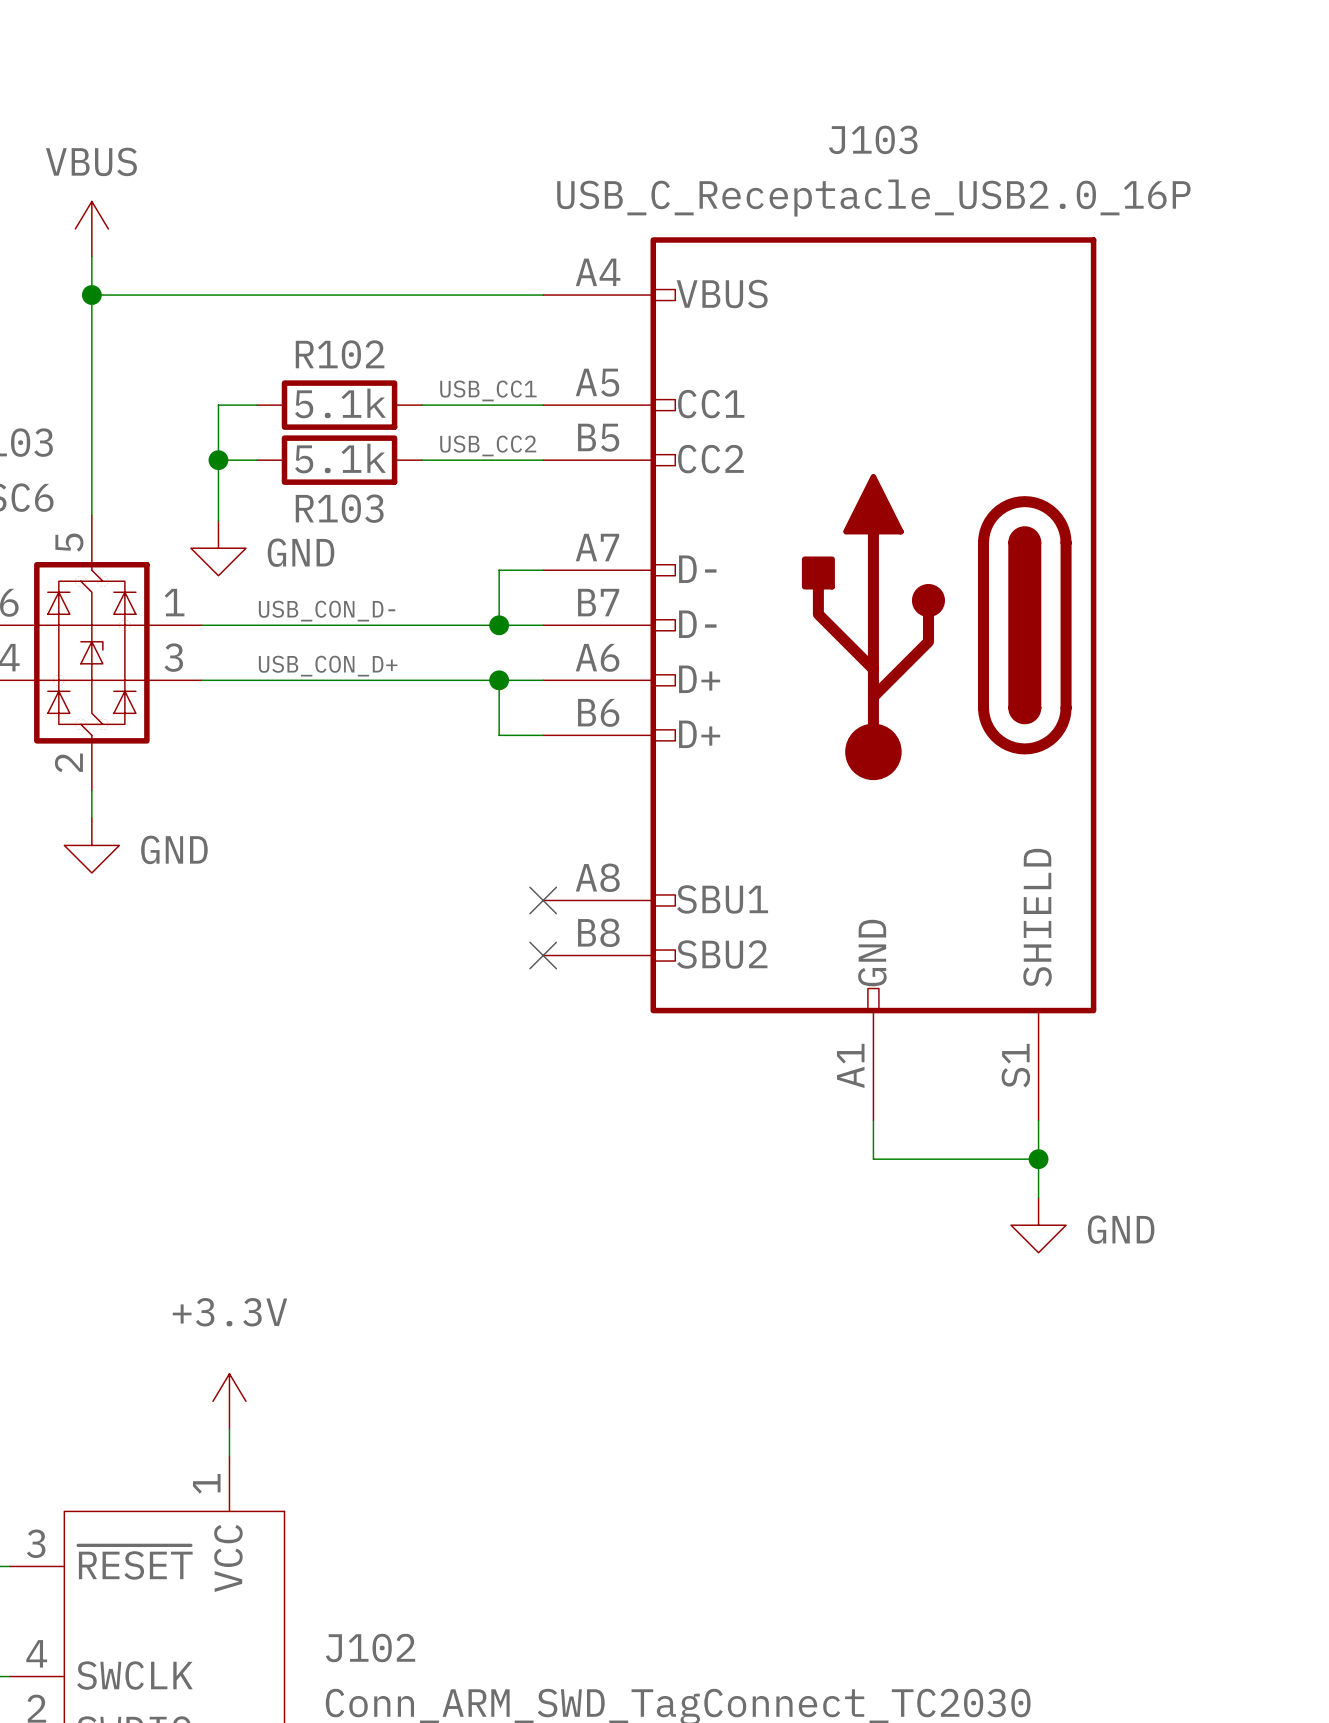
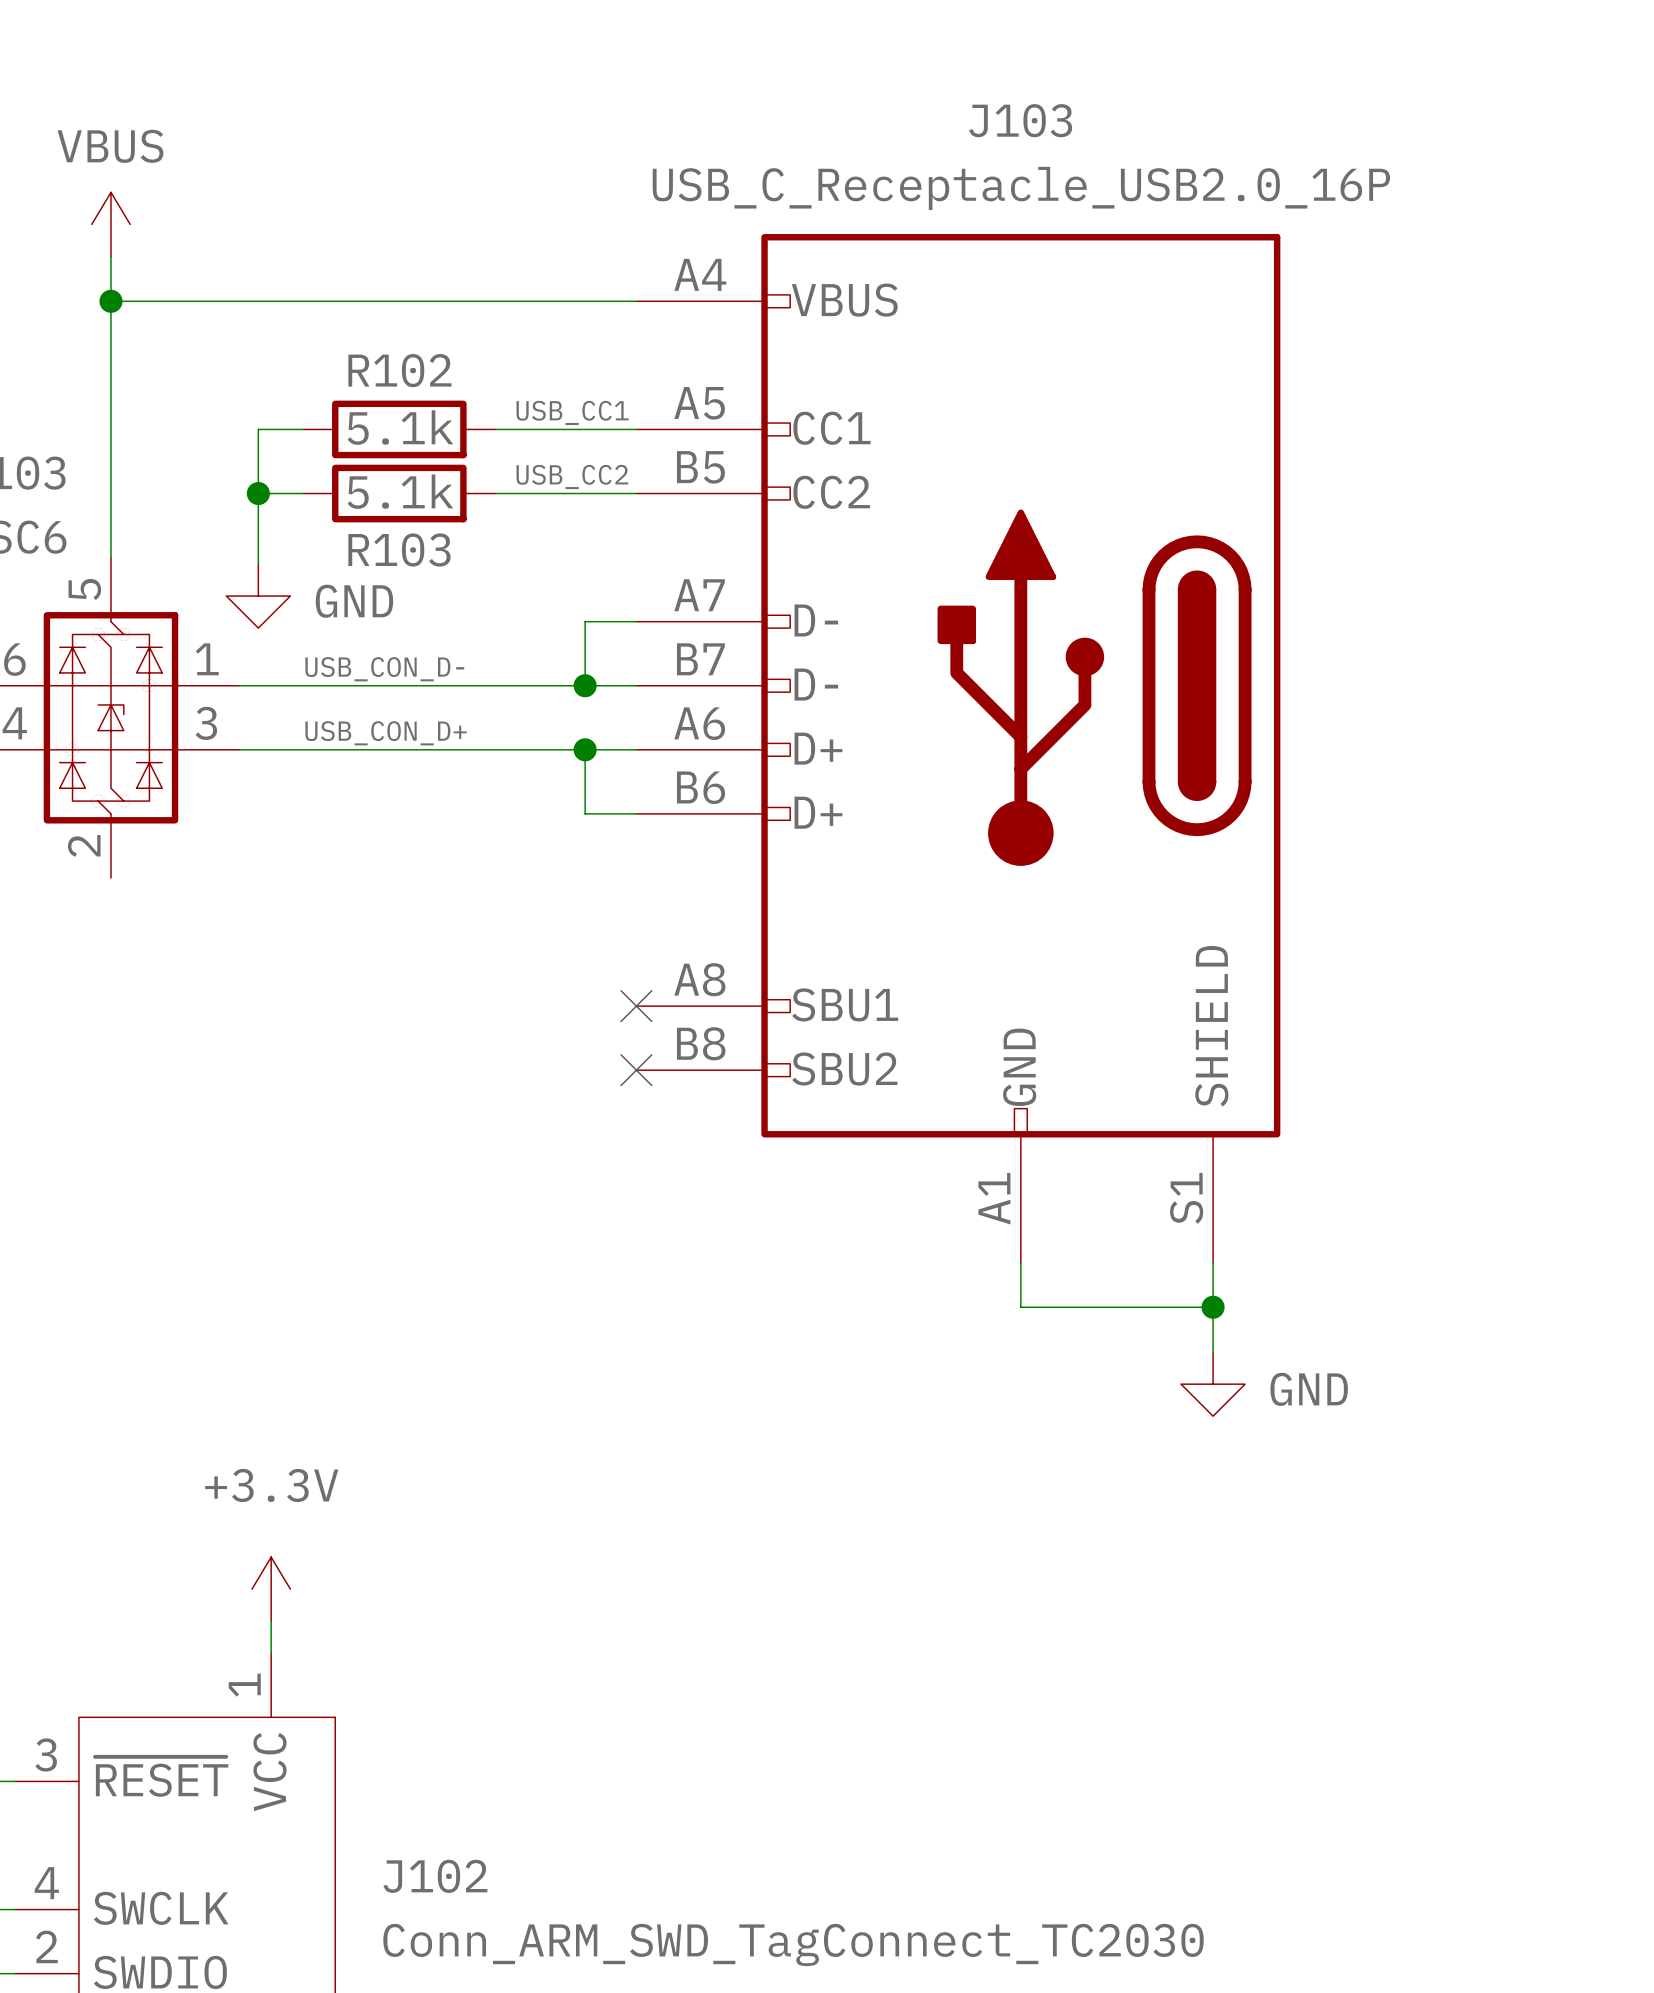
wire: (91, 790) (91, 817) -> none
power symbol: GND (91, 845) -> none

